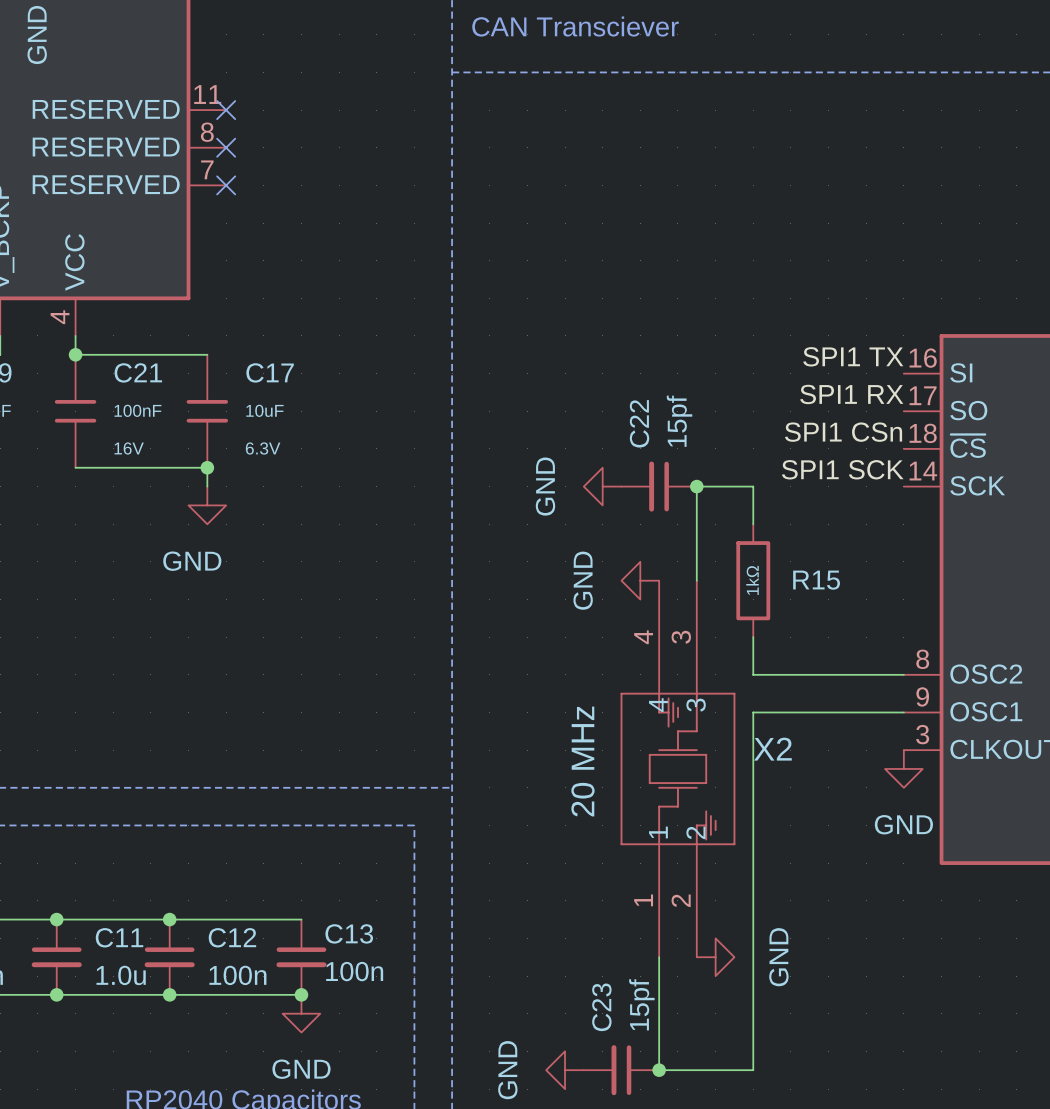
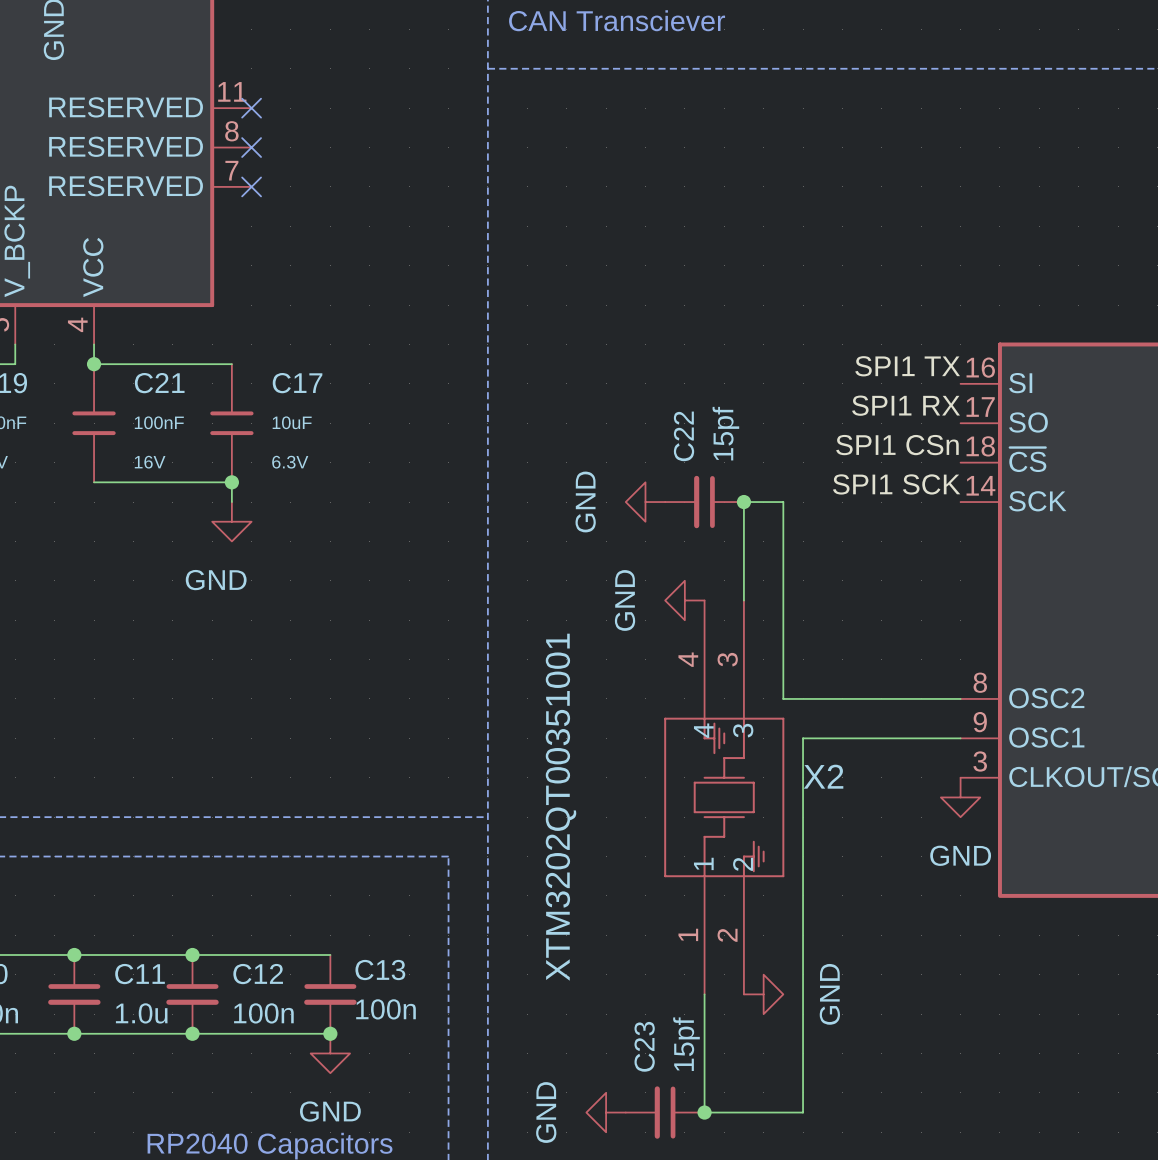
wire: (734, 486) (753, 486) (753, 524) -> (783, 502) (783, 698) (803, 698)
R15: 1kΩ (753, 580) -> none
wire: (753, 637) (753, 674) -> none
X2 value: 20 MHz (582, 761) -> XTM3202QT00351001 (561, 807)

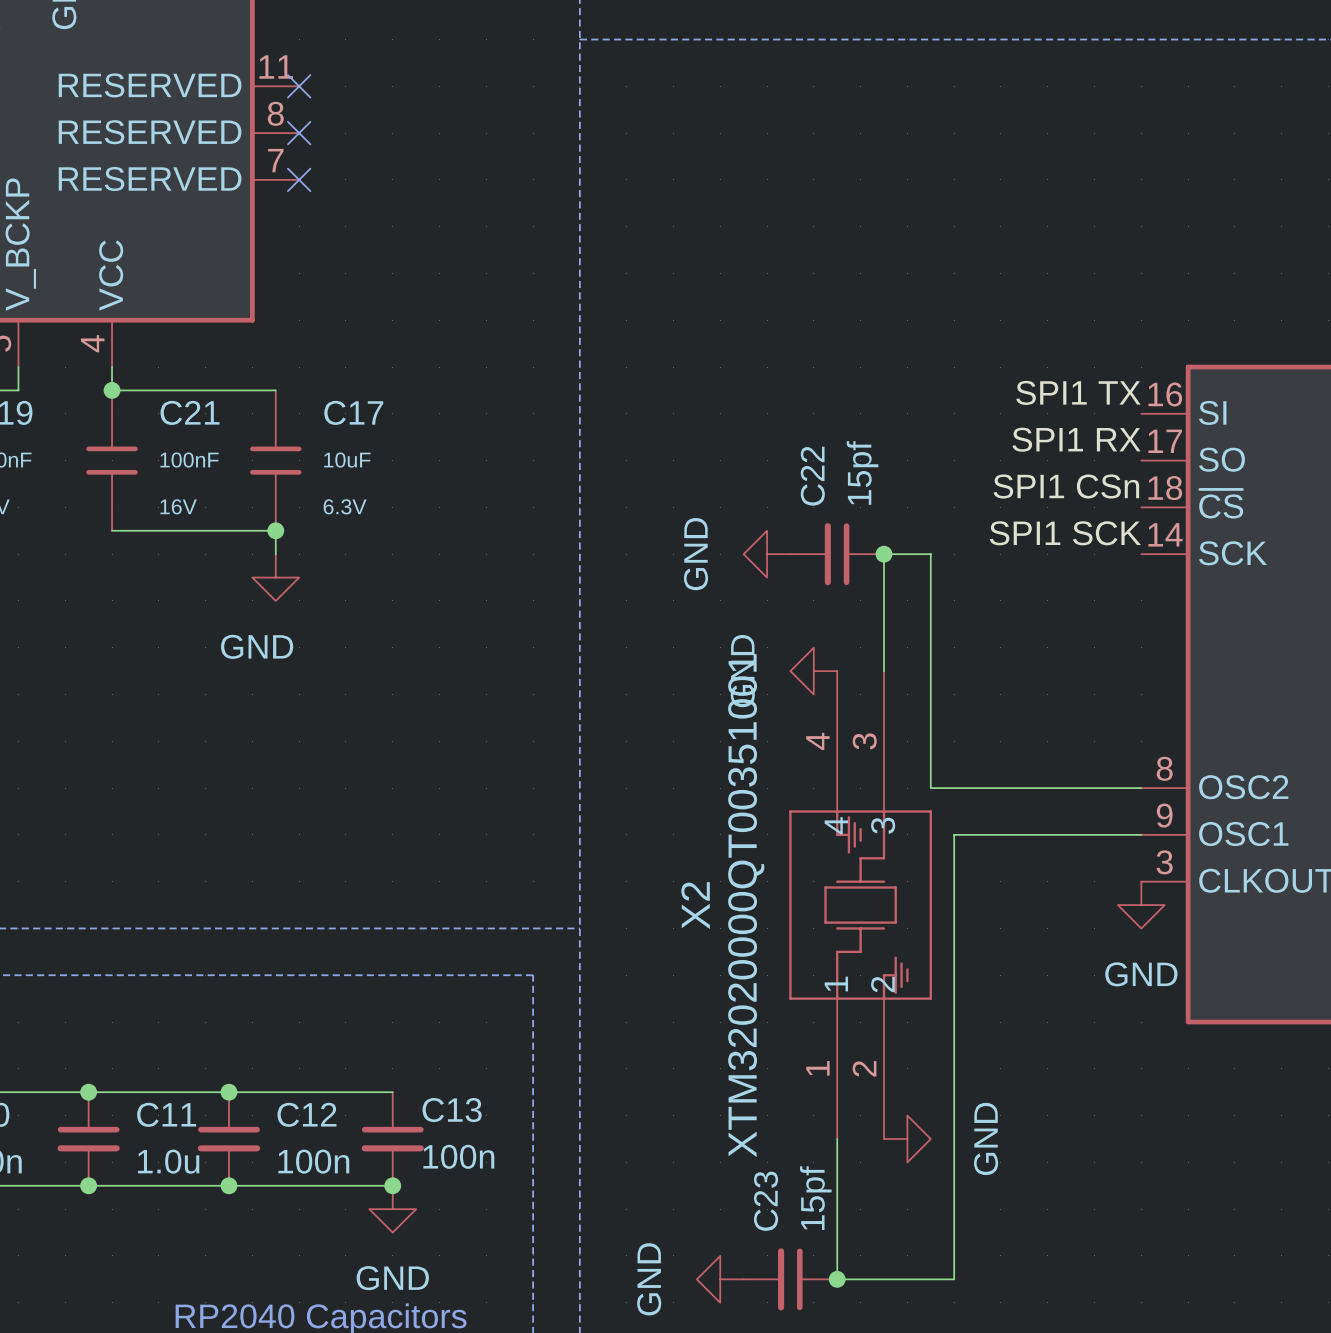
X2 name rotation: 0° (823, 776) -> 90° counterclockwise (695, 905)
X2 name position: X2 (823, 776) -> X2 (695, 905)
X2 value: XTM3202QT00351001 (561, 807) -> XTM32020000QT00351001 (746, 905)

